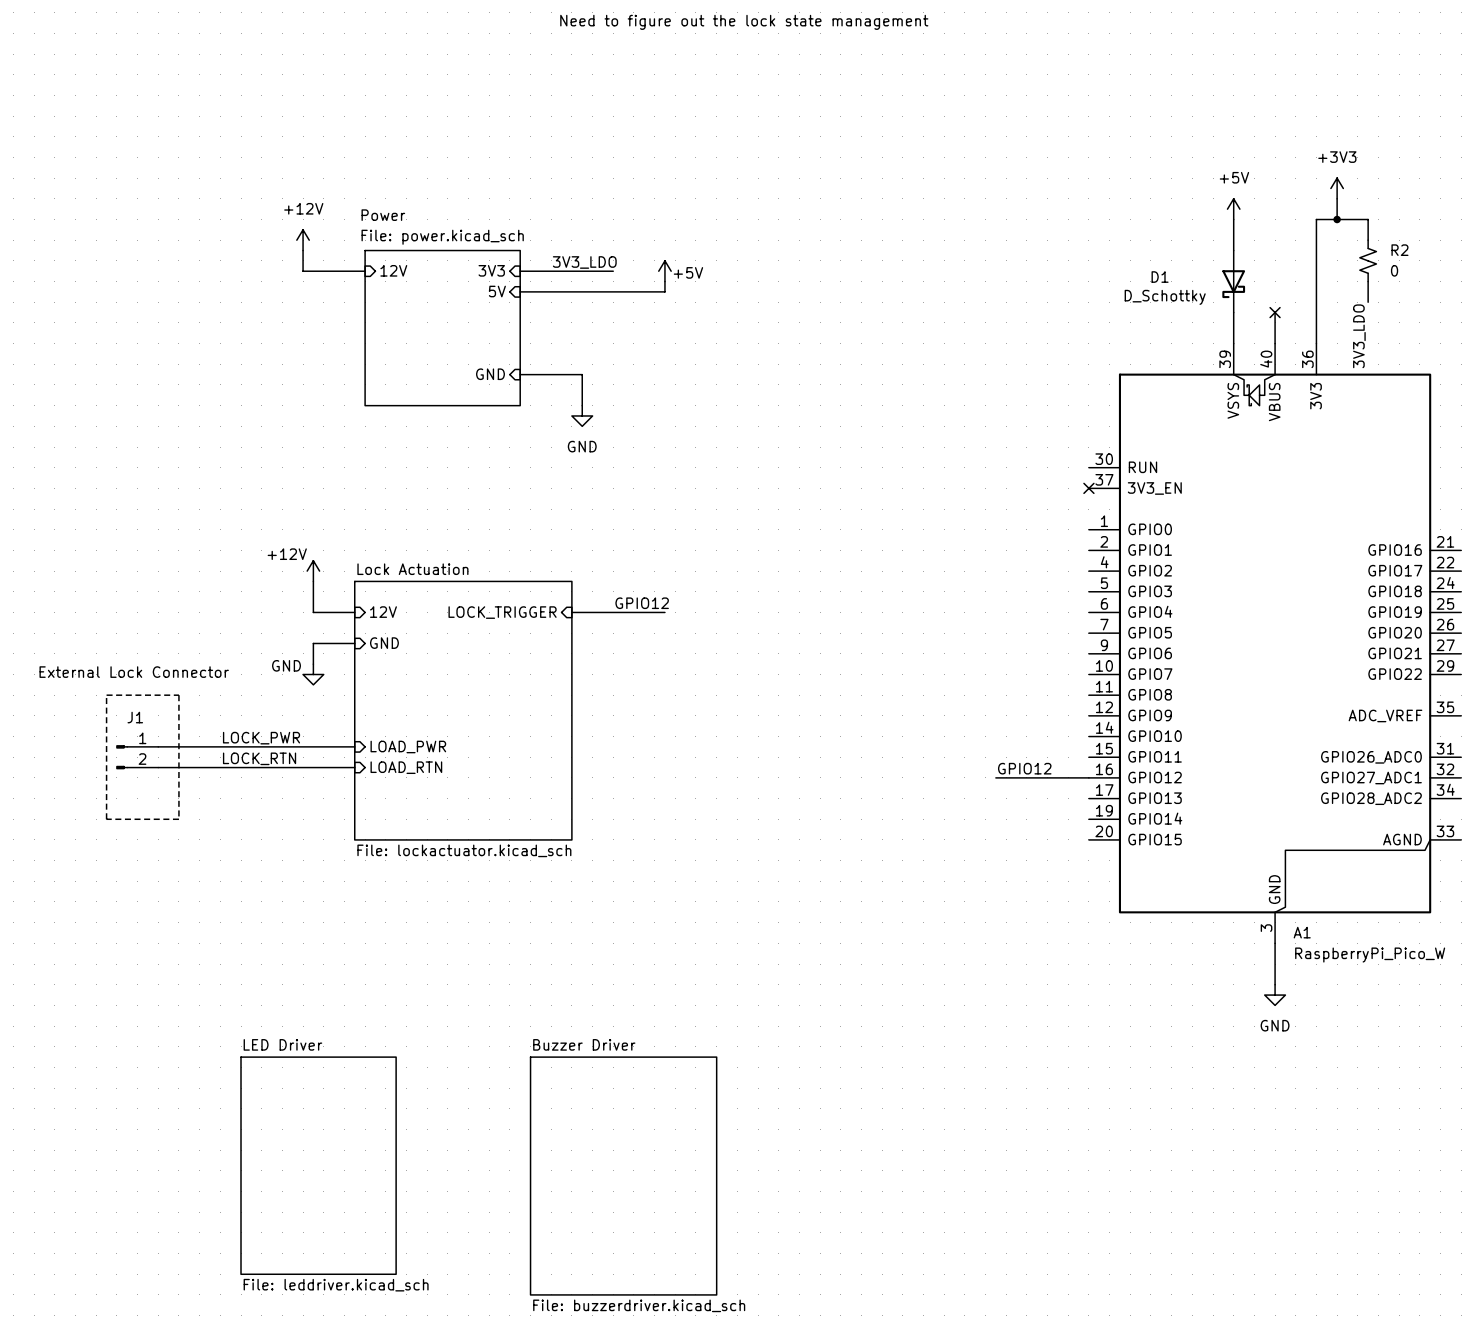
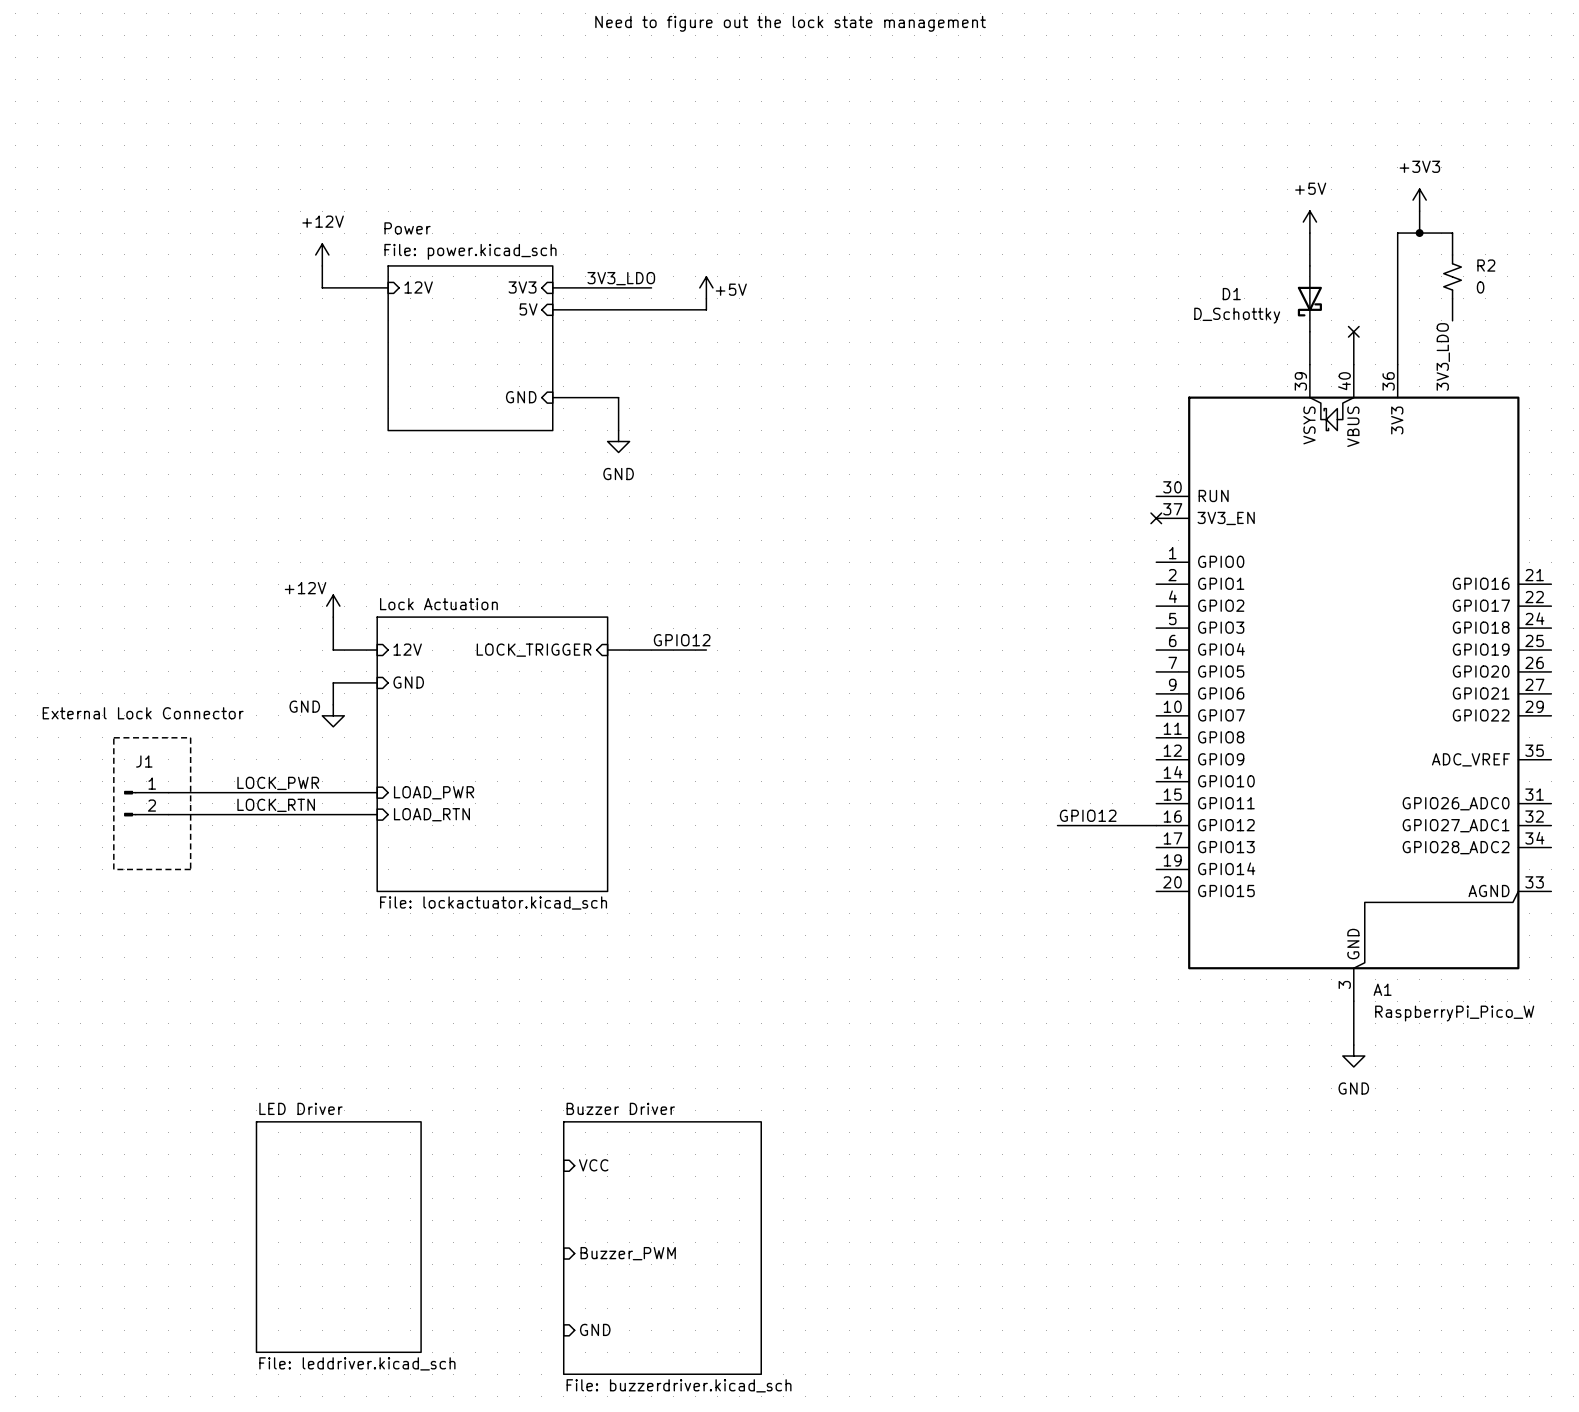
sheet pin: none -> VCC (593, 1165)
sheet pin: none -> Buzzer_PWM (628, 1253)
sheet pin: none -> GND (595, 1329)

